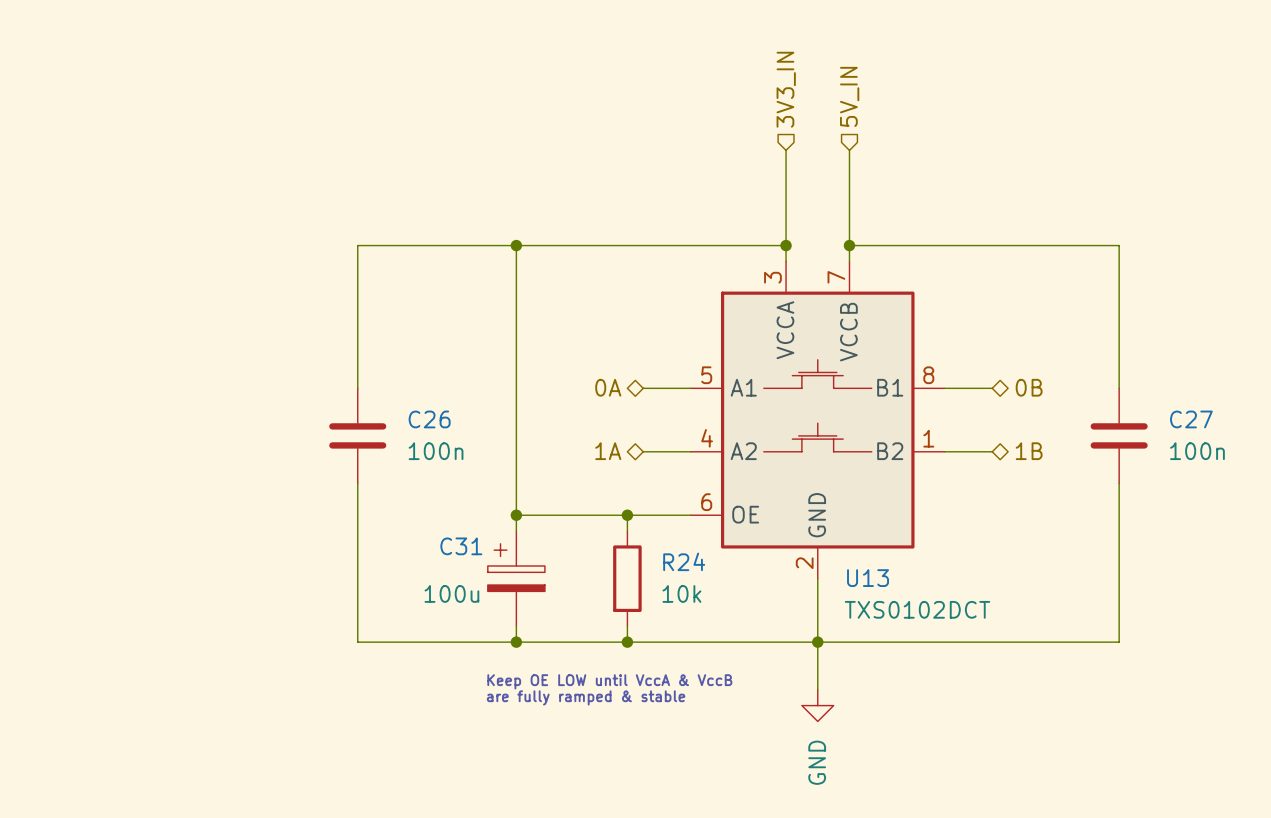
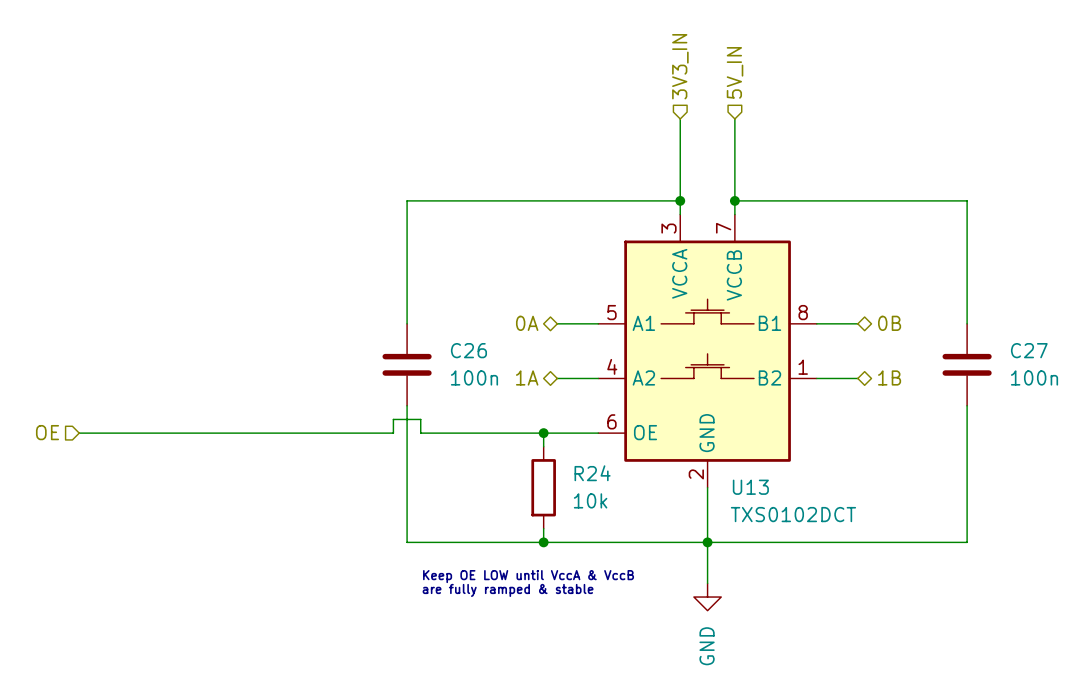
wire: (468, 245) (357, 245) (357, 388) -> (407, 200) (407, 323)
wire: (516, 245) (516, 531) -> none
junction: (516, 245) -> none
C26 position: (357, 435) -> (407, 364)
wire: (357, 483) (357, 642) (468, 642) -> (407, 405) (407, 542)
hierarchical label: none -> OE (47, 432)
wire: none -> (79, 433) (393, 433) (393, 419) (420, 419) (420, 433) (448, 433)
junction: (516, 515) -> none
C31: 100u (516, 578) -> none
wire: (516, 626) (516, 642) -> none
junction: (516, 642) -> none

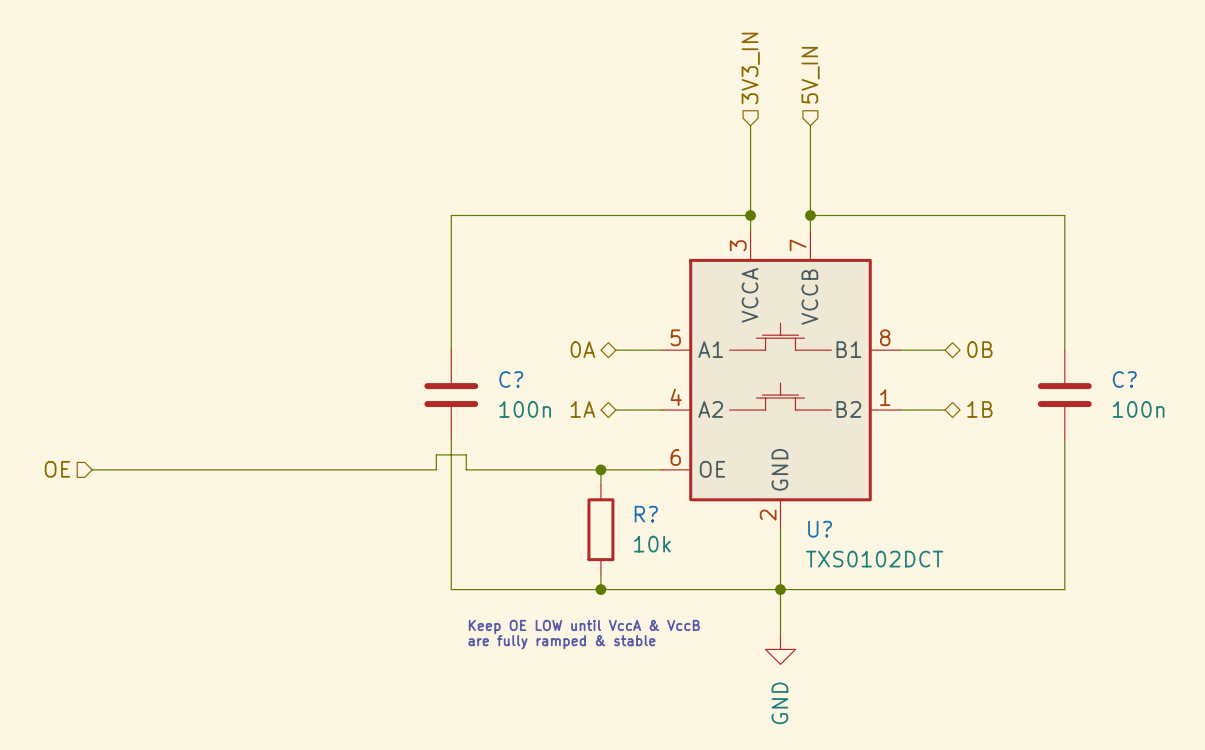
C26 name: C26 (468, 350) -> C? (511, 379)
C27 name: C27 (1029, 350) -> C? (1124, 379)
R24 name: R24 (592, 473) -> R? (646, 514)
U13 name: U13 (750, 487) -> U? (820, 529)

